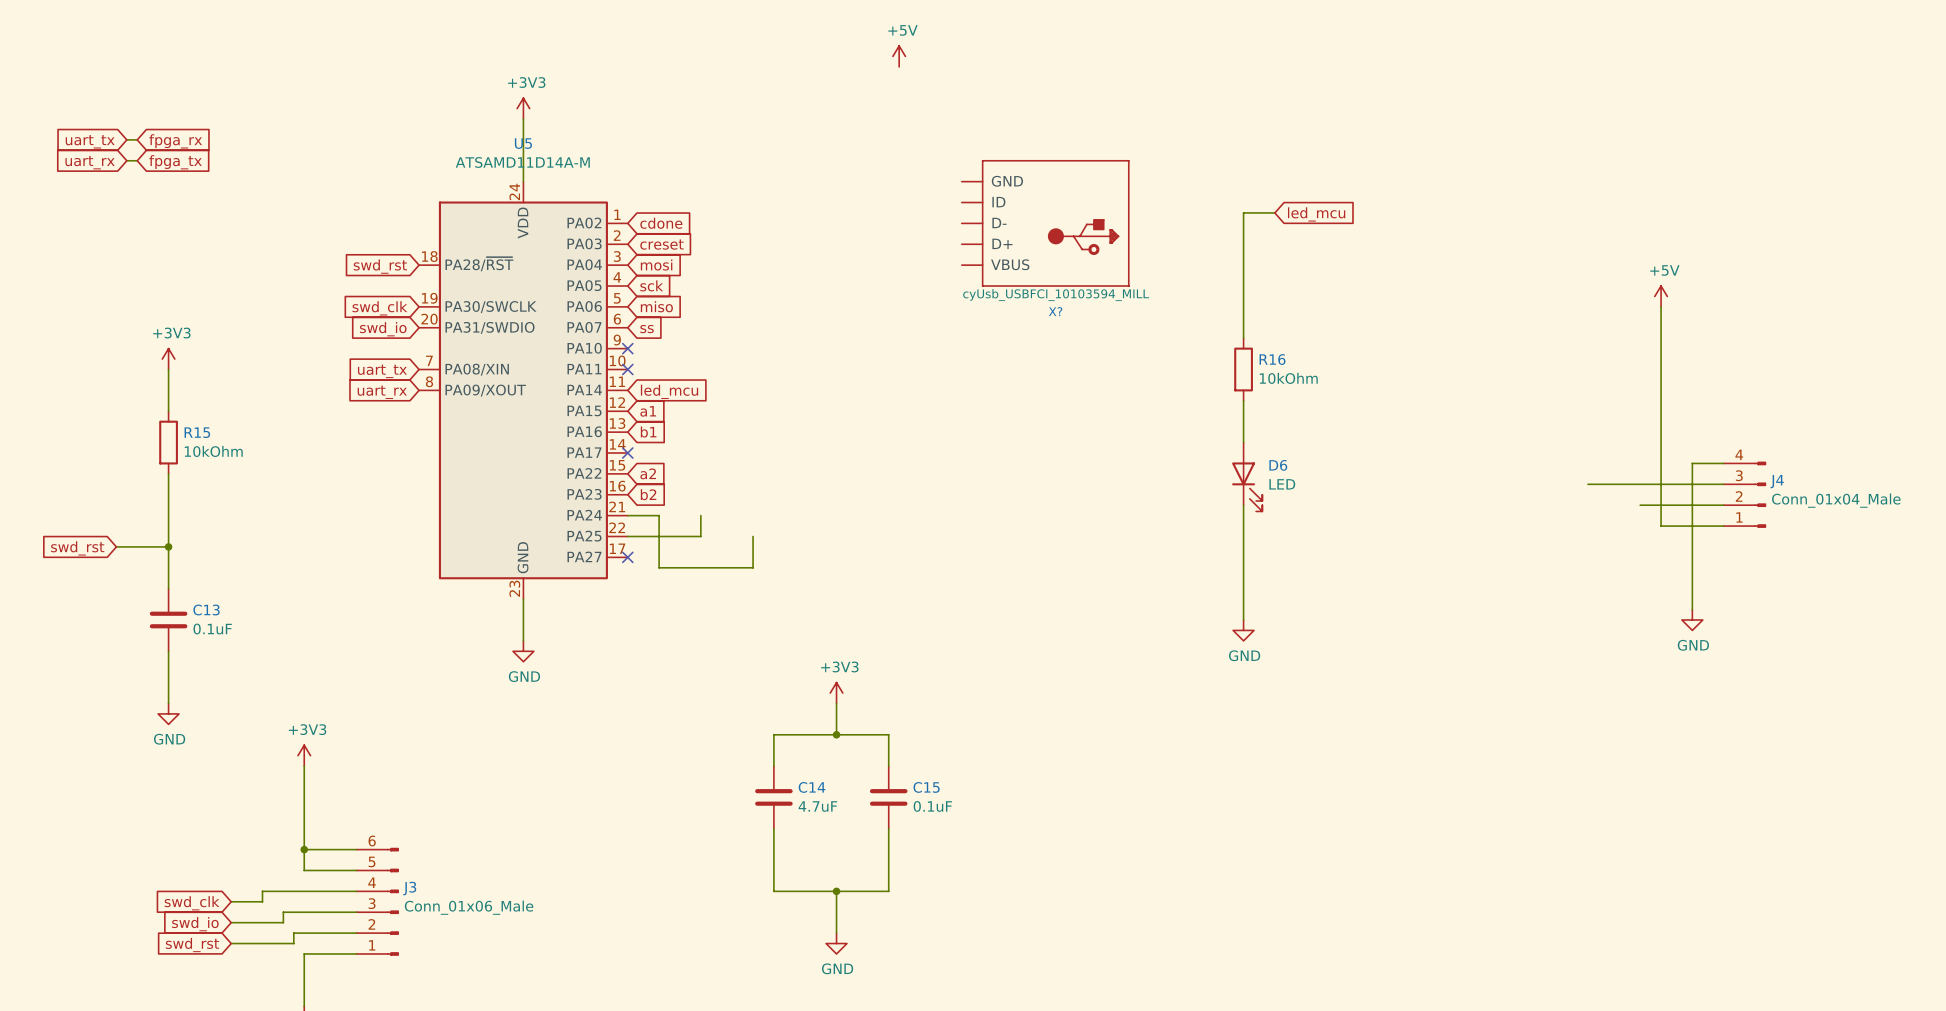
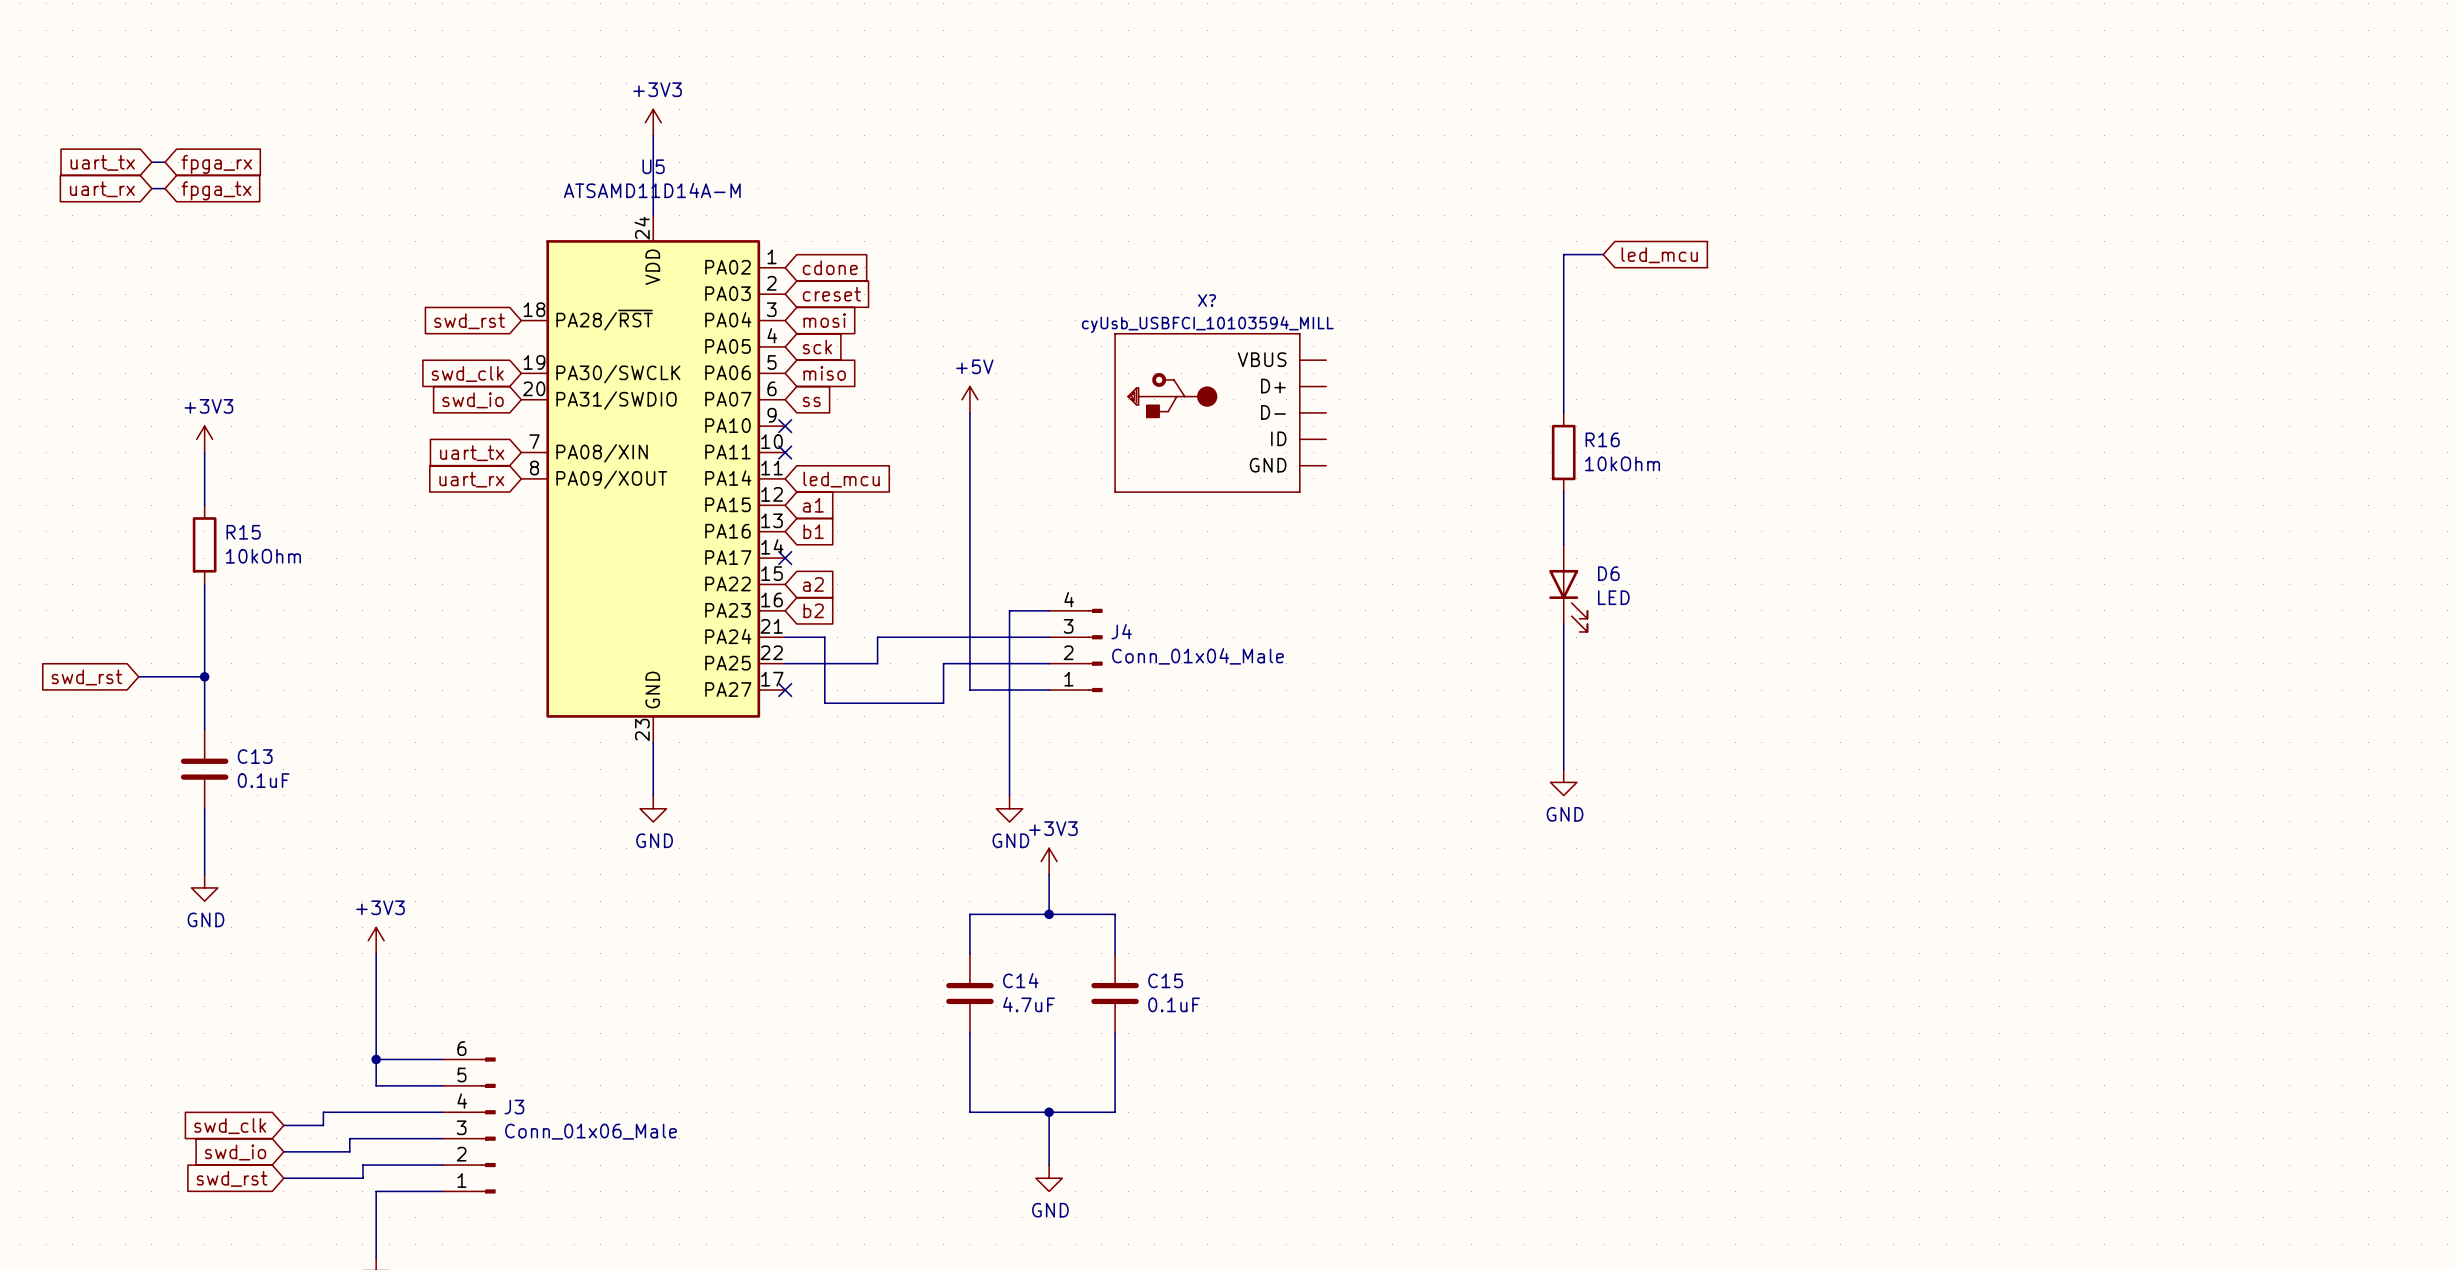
power symbol: +5V (899, 56) -> none
X? position: (1045, 223) -> (1220, 412)
X? rotation: 0° (1055, 223) -> 180° (1207, 412)
power symbol: +5V (1661, 296) -> none
wire: (1661, 306) (1661, 526) (1723, 526) -> none
power symbol: none -> +5V (969, 399)
wire: none -> (969, 412) (969, 690) (1049, 690)
wire: (1723, 463) (1692, 463) (1692, 609) -> none
wire: (1587, 484) (1723, 484) -> none
wire: none -> (1049, 610) (1009, 610) (1009, 795)
J4 position: (1744, 494) -> (1075, 650)
wire: (1640, 505) (1723, 505) -> none
wire: none -> (877, 637) (1049, 637)
wire: none -> (943, 663) (1049, 663)
power symbol: GND (1692, 620) -> none
power symbol: none -> GND (1009, 808)

